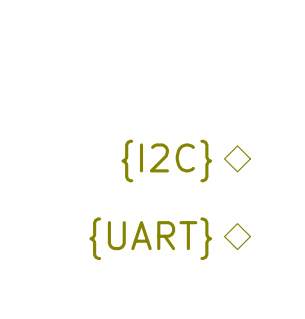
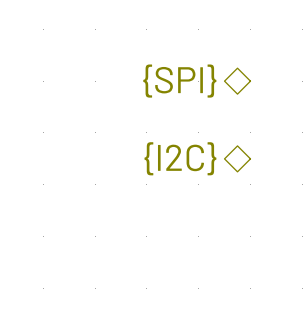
hierarchical label: none -> {SPI} (179, 81)
hierarchical label: {UART} (150, 238) -> none

